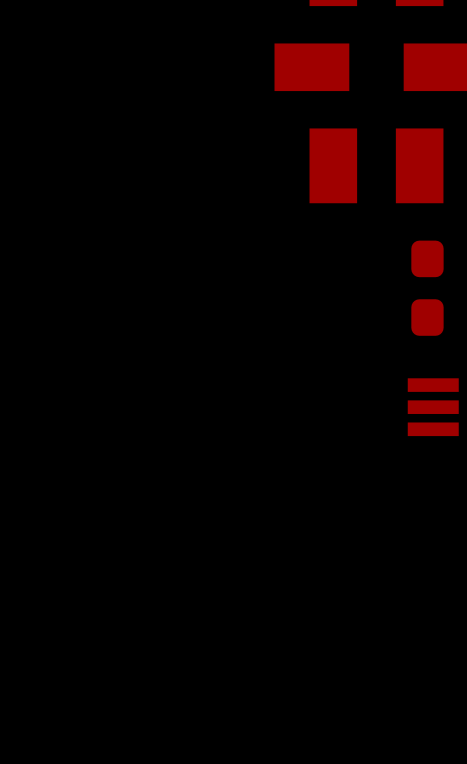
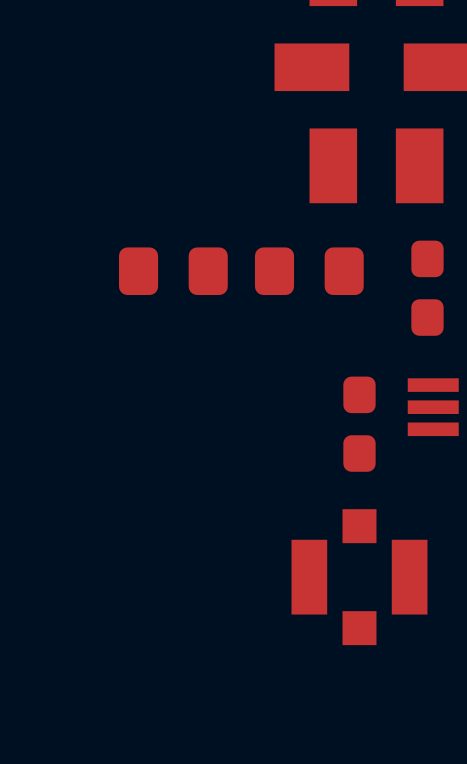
part: none -> (173, 271)
part: none -> (309, 271)
part: none -> (359, 424)
part: none -> (359, 577)

